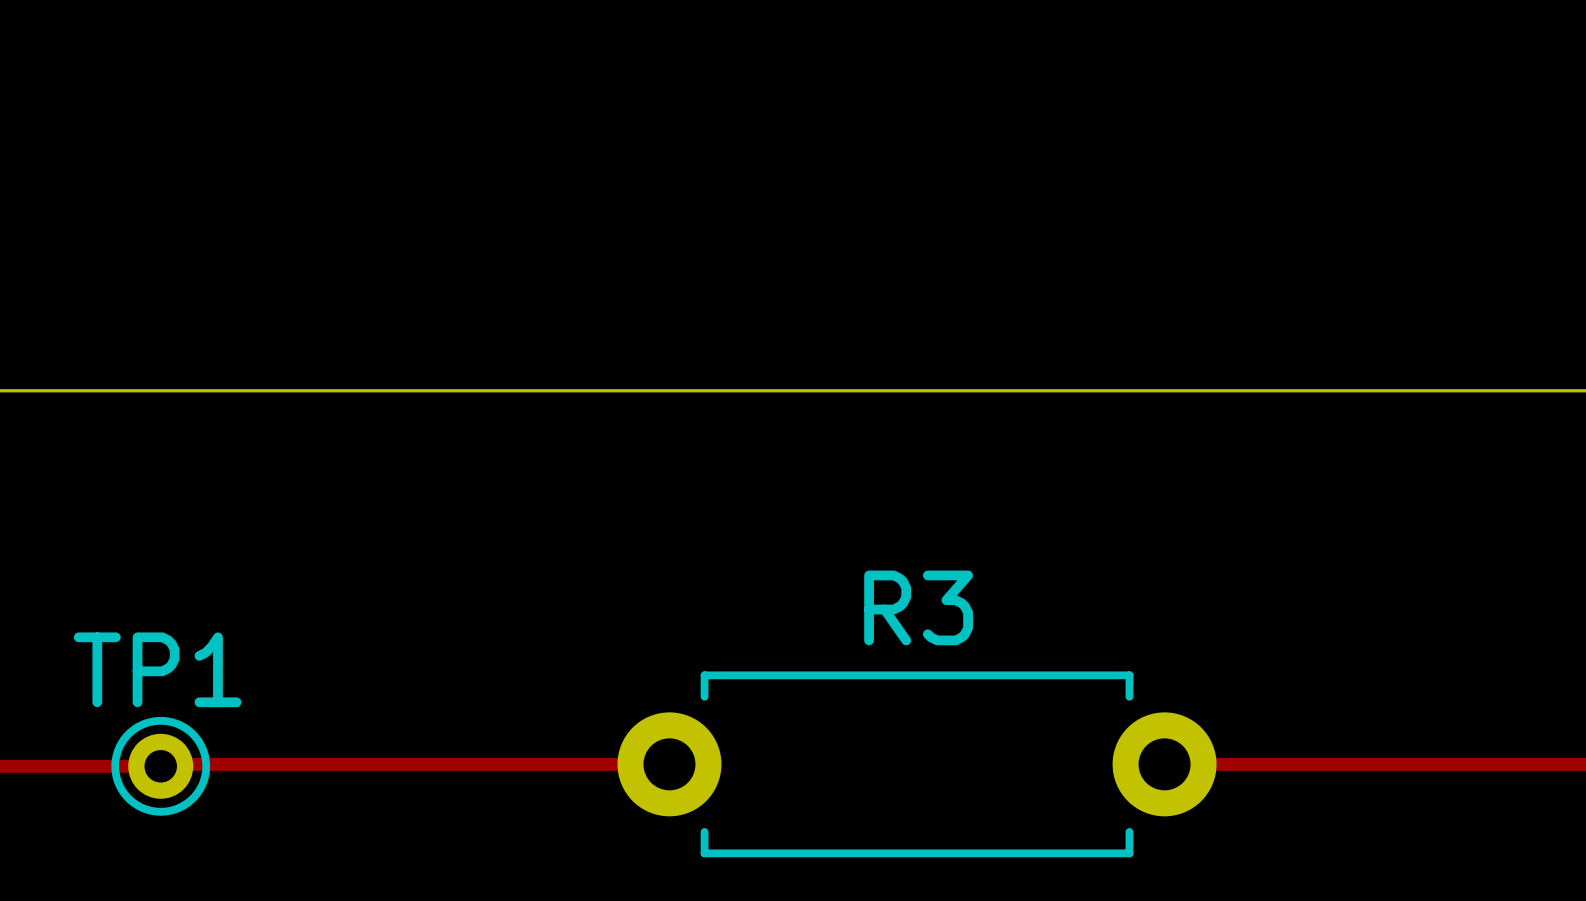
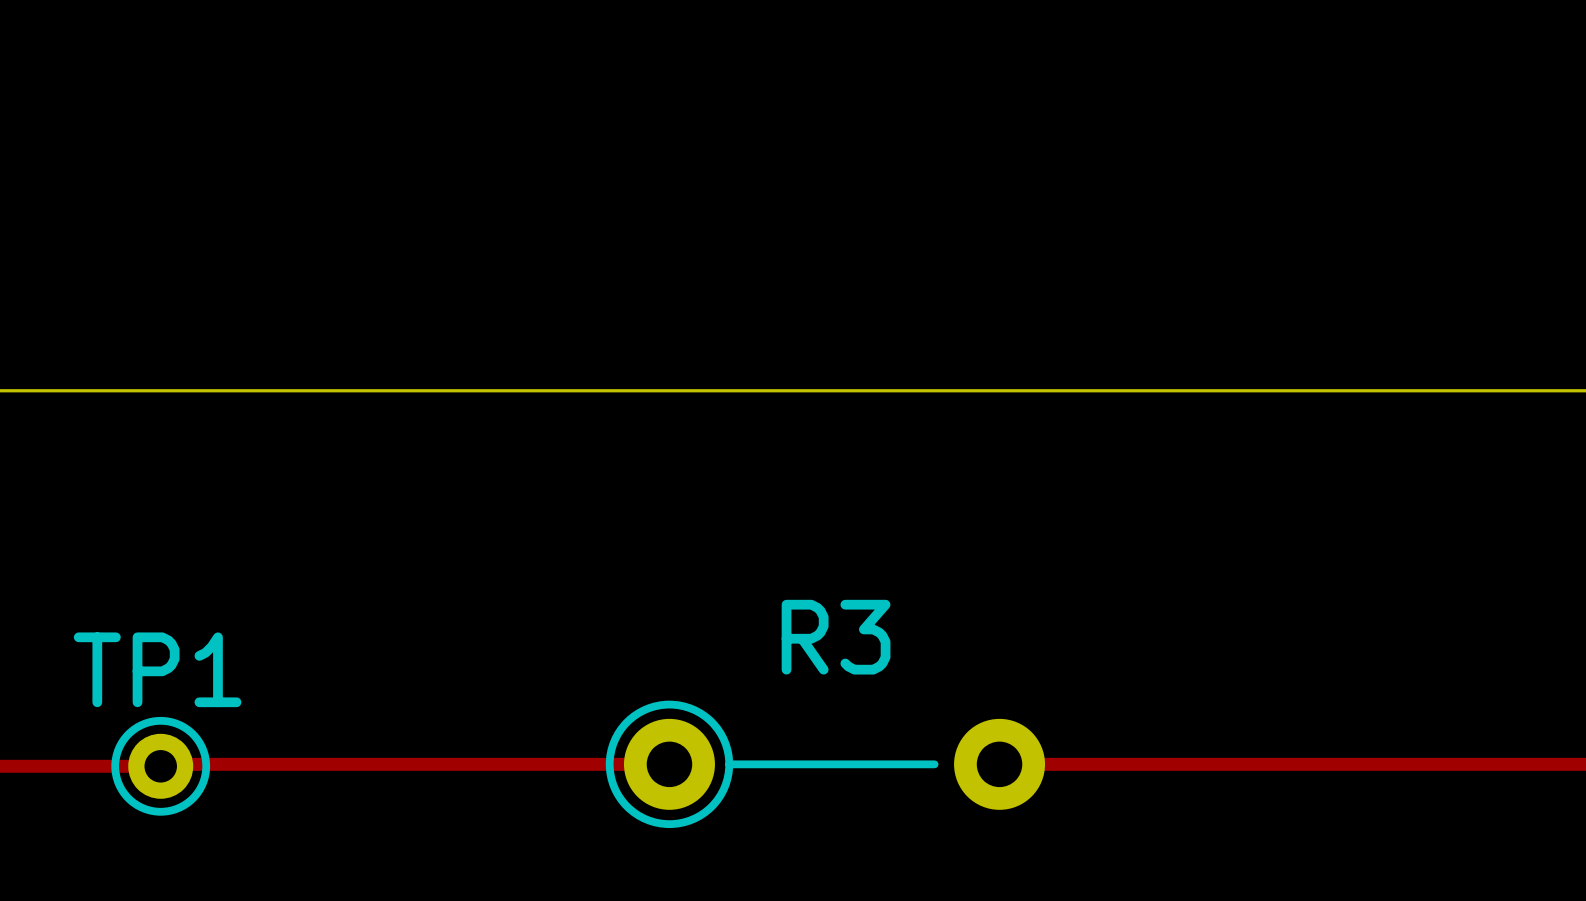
R3 footprint: [617, 671, 1217, 858] -> [605, 700, 1046, 829]
track: none -> (999, 764) (1164, 764)

